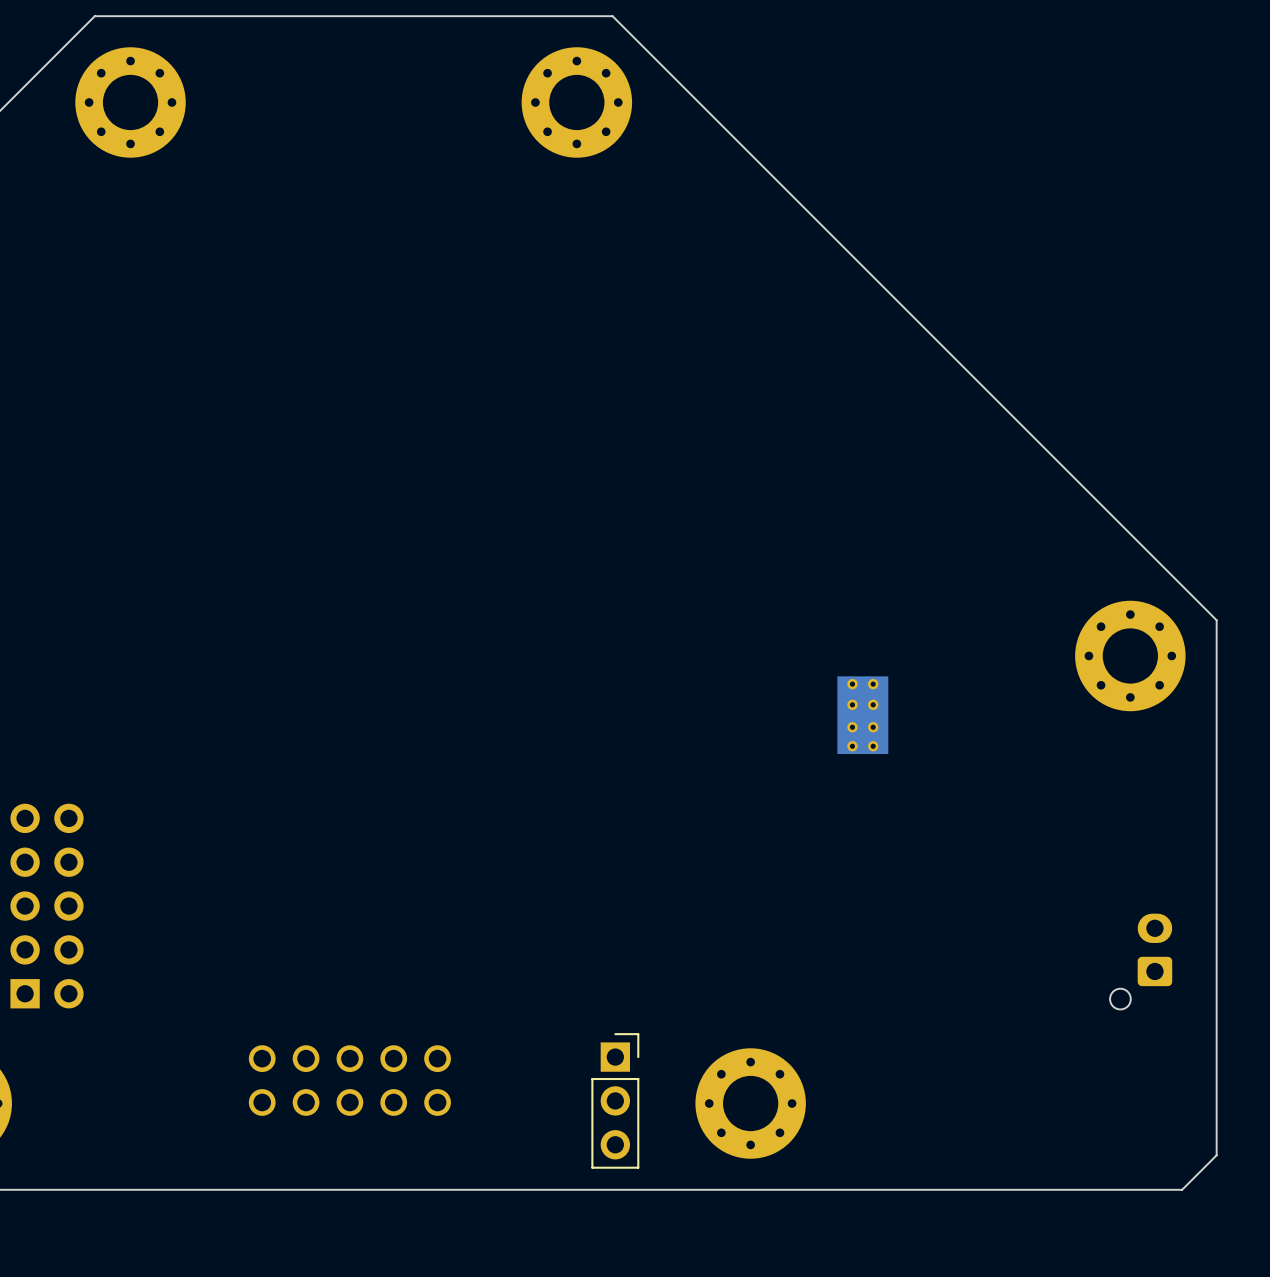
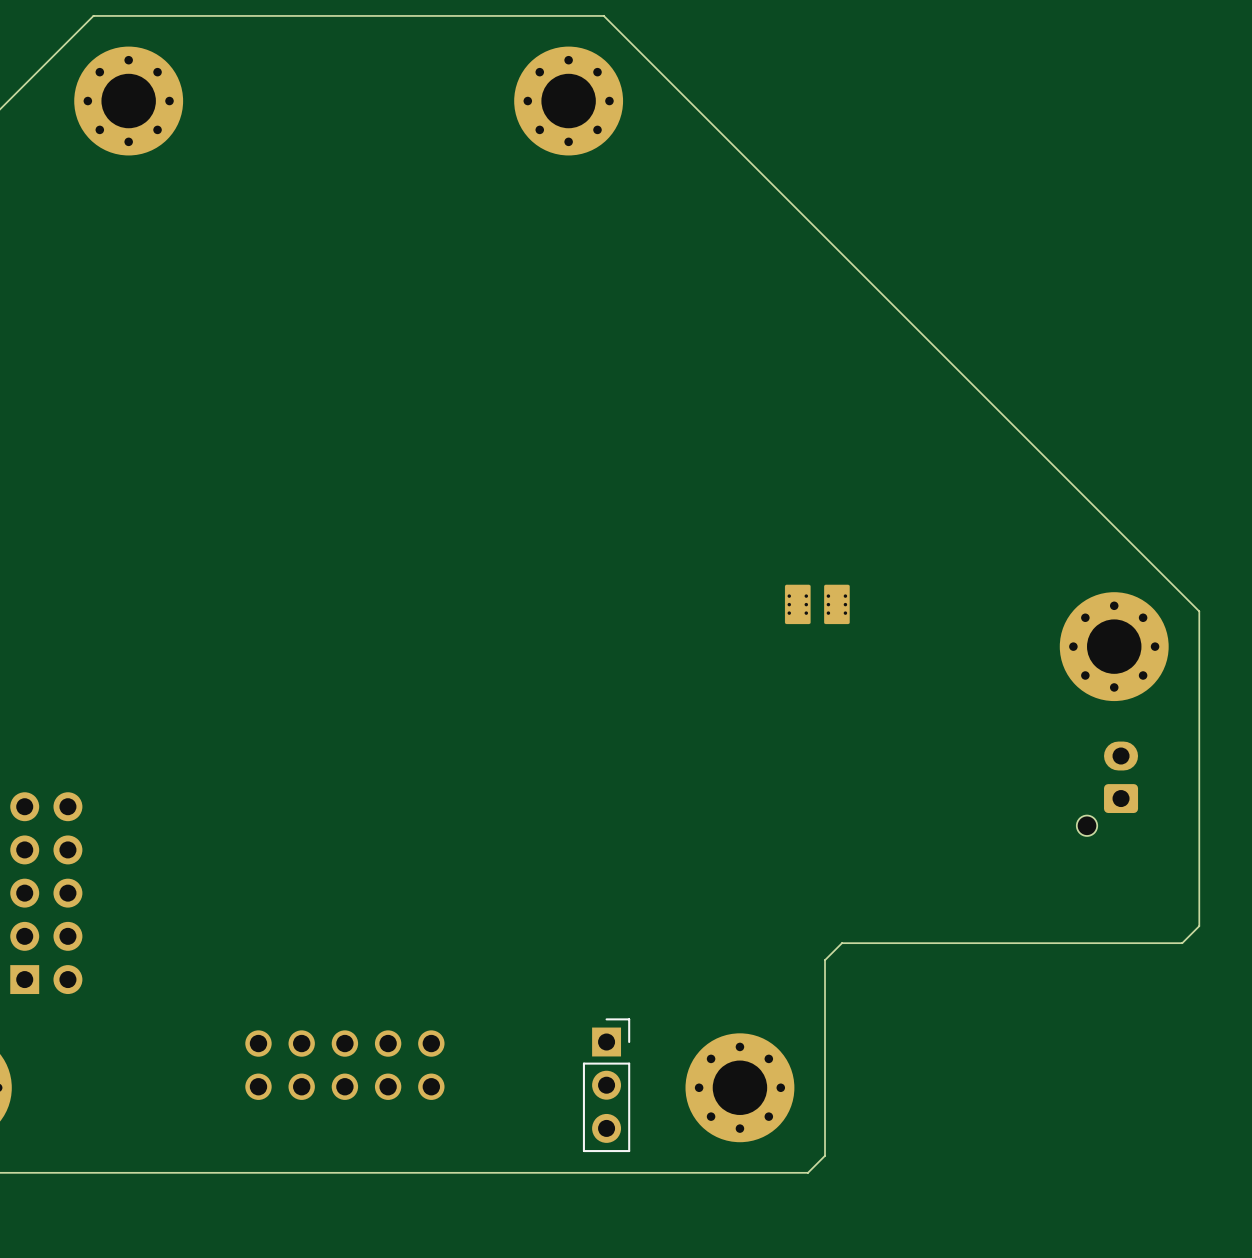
part: none -> (817, 604)
part: (862, 715) -> none
board edge: (1216, 939) (1216, 1155) (1182, 1189) (819, 1189) -> (1199, 926) (1182, 943) (842, 943) (825, 960) (825, 1155) (807, 1172)
part position: (1141, 961) -> (1107, 788)

